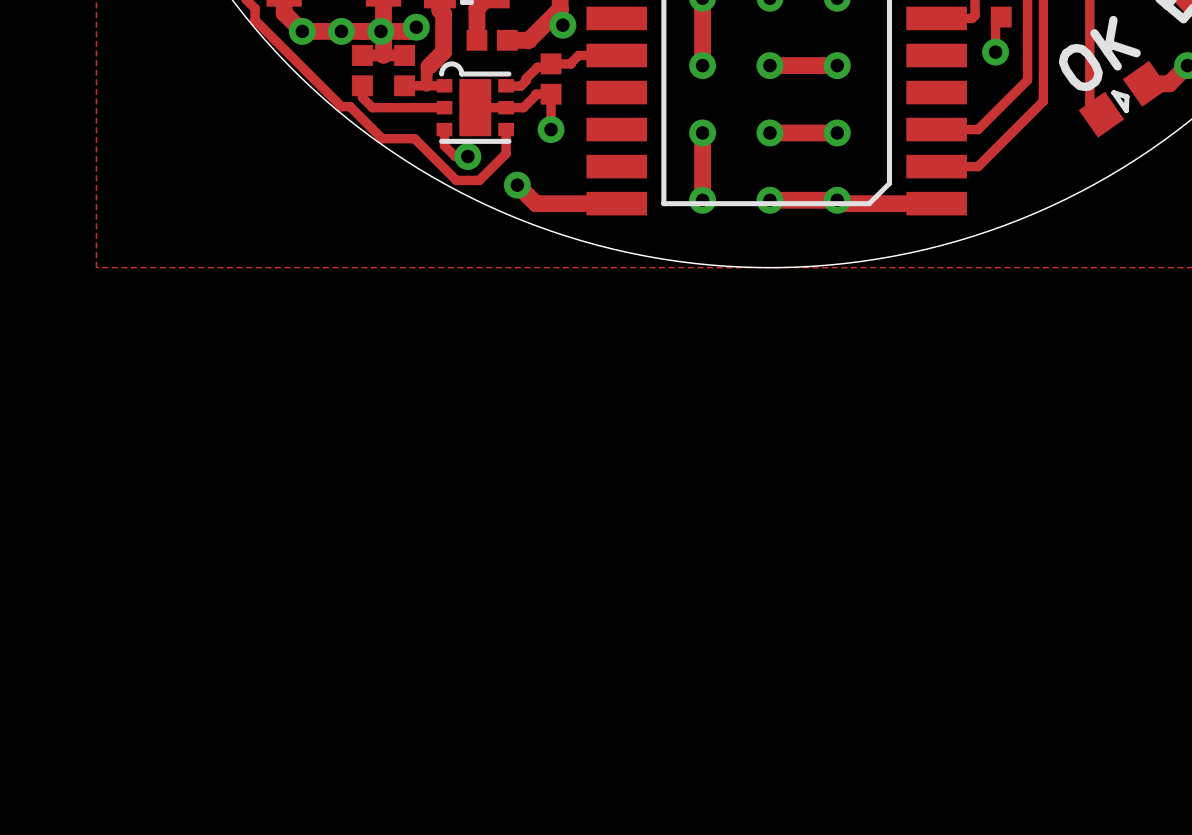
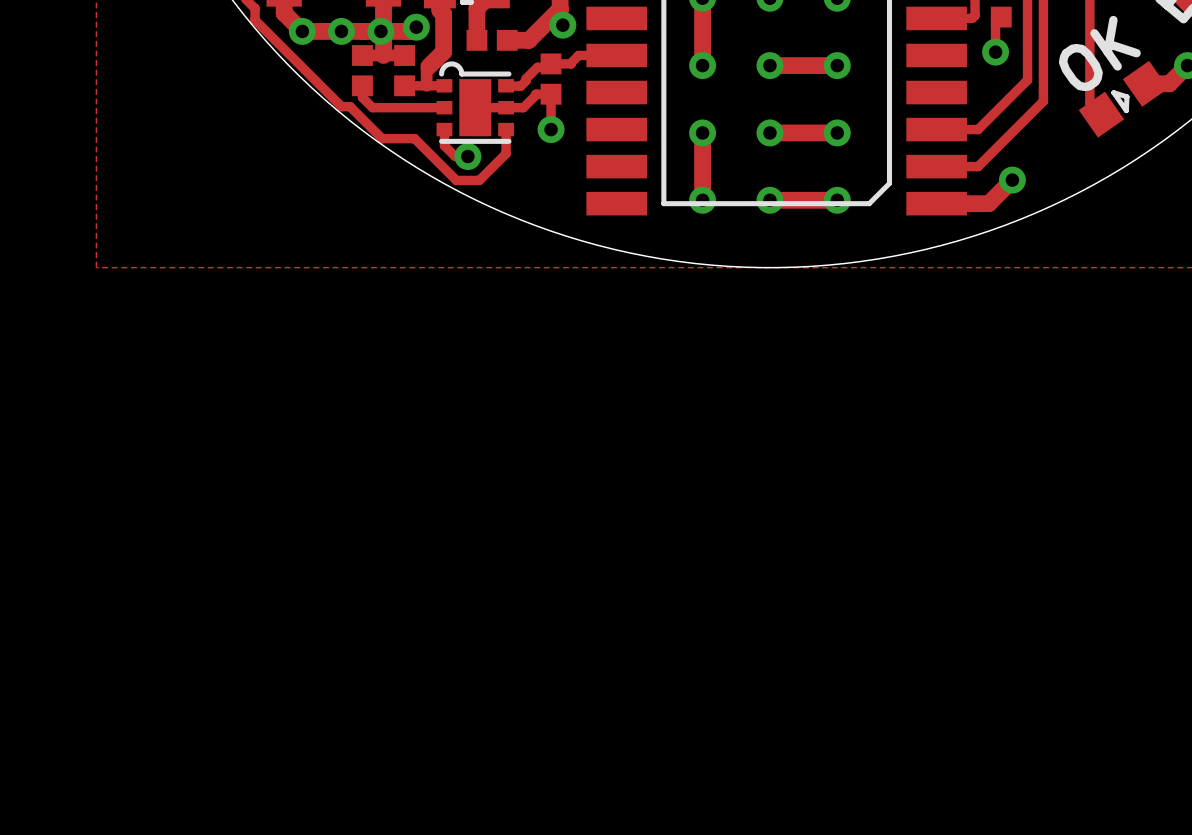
track: none -> (1012, 180) (988, 203) (938, 203)
via: none -> (1012, 180)
track: (517, 185) (535, 203) (616, 203) -> none
via: (517, 185) -> none
track: (837, 200) (840, 203) (936, 203) -> none

